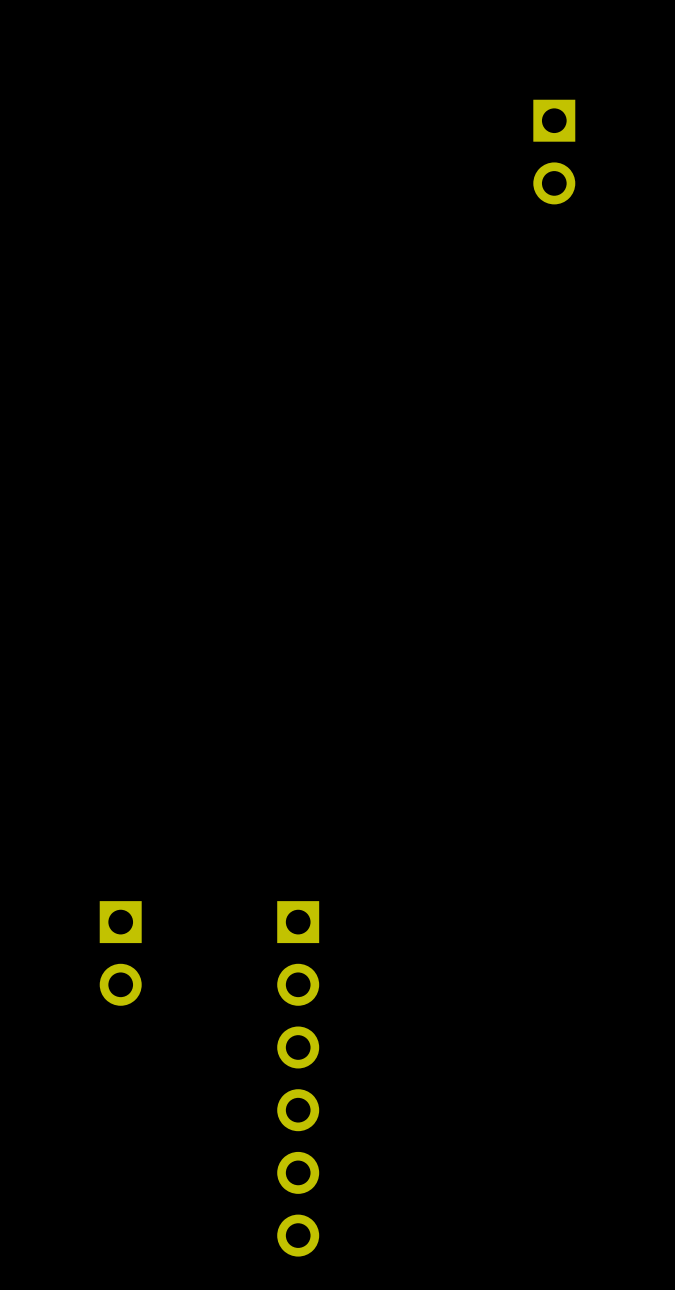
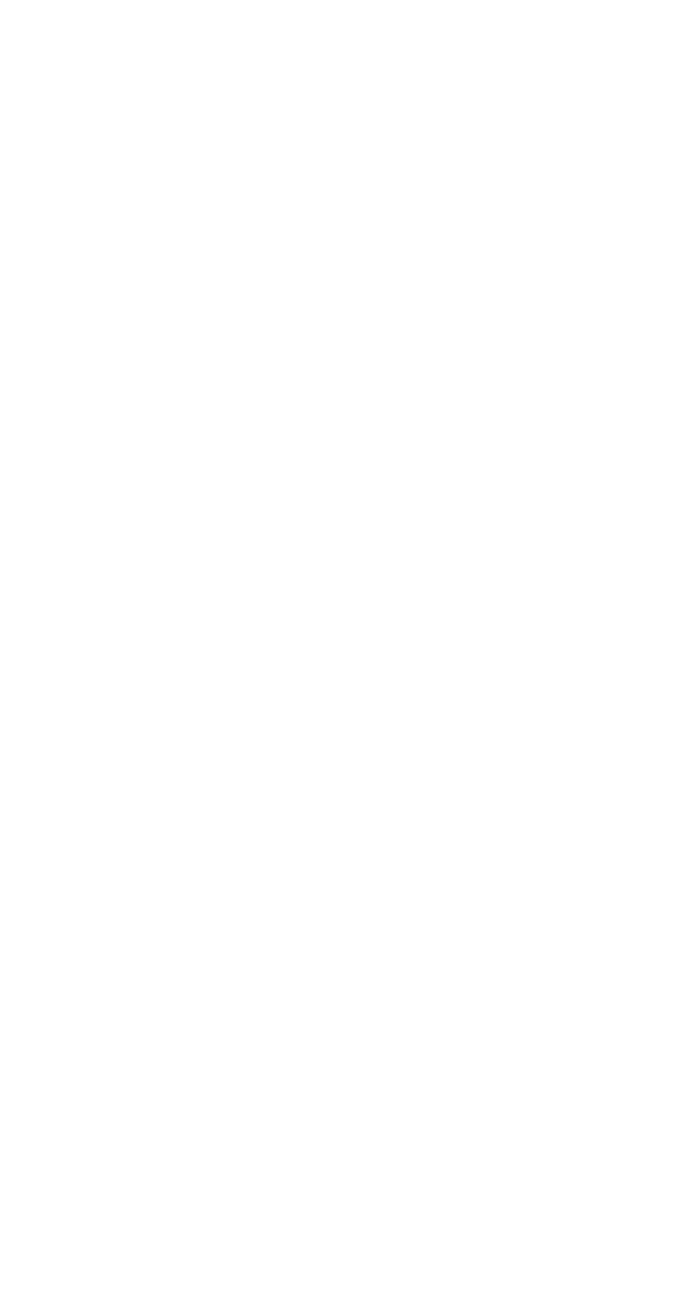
part: (554, 152) -> none
part: (120, 953) -> none
part: (298, 1078) -> none

